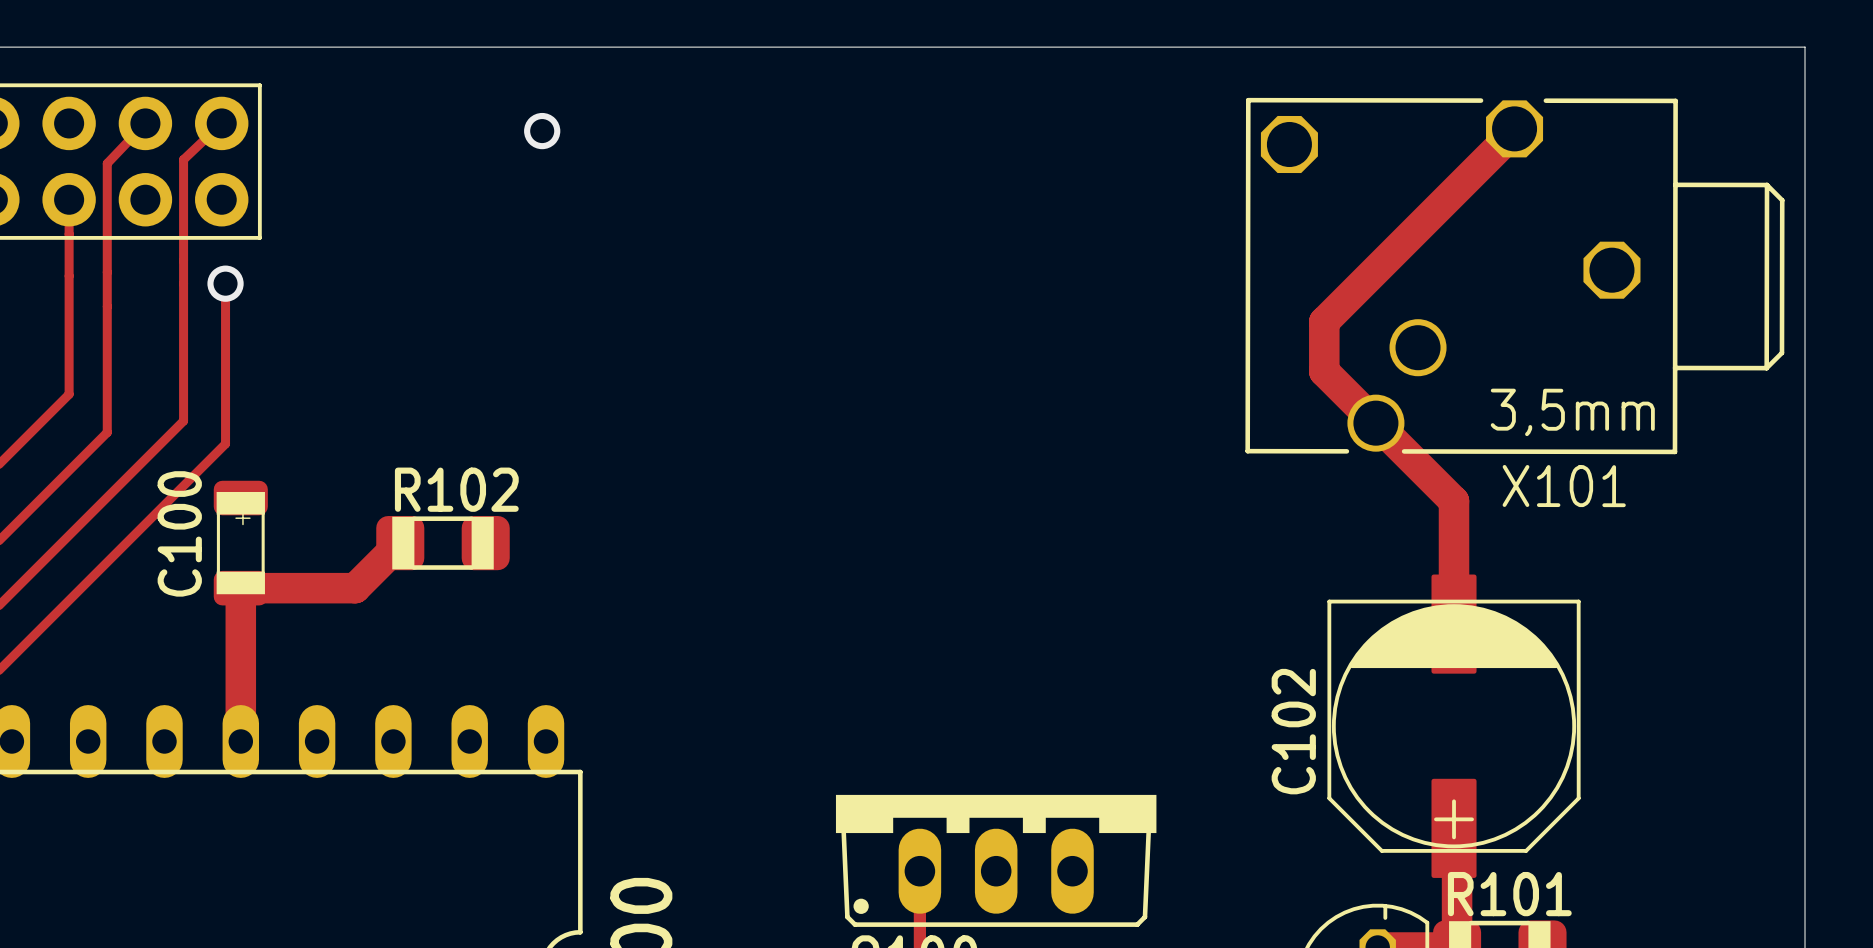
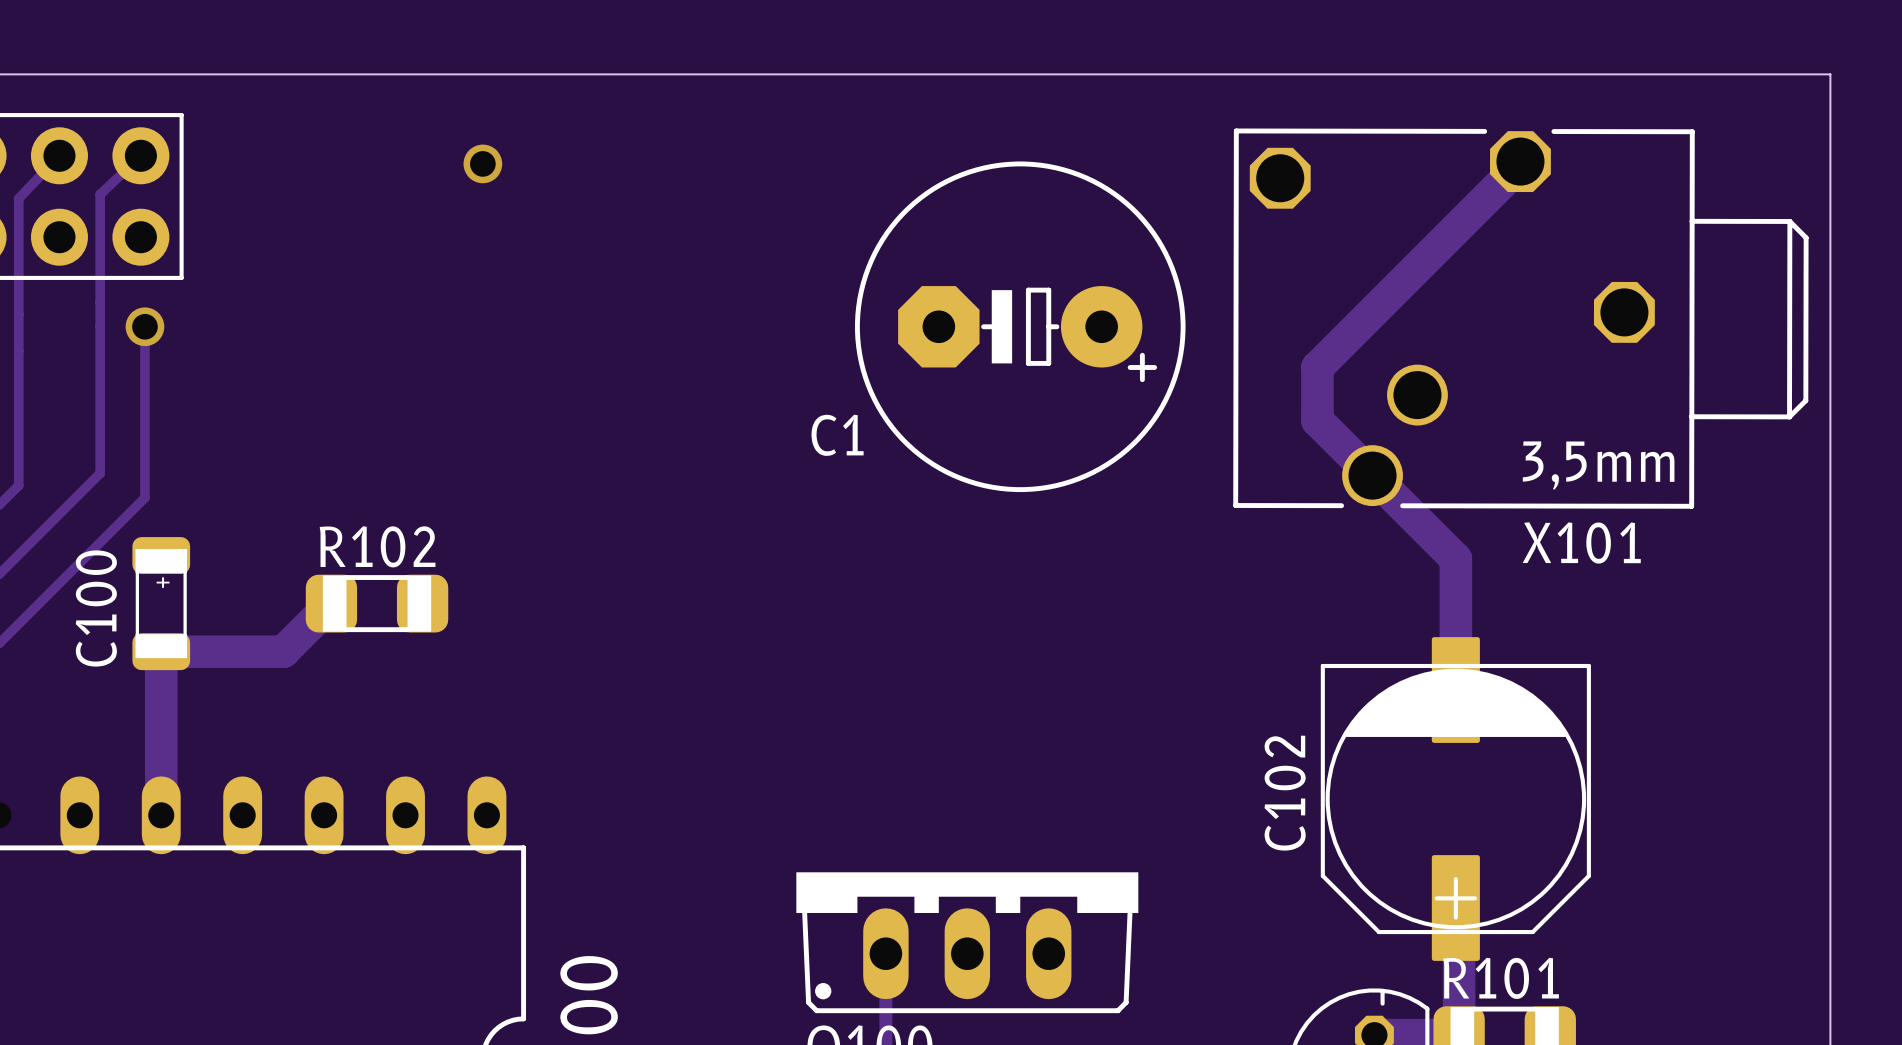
C1: none -> (1020, 326)

